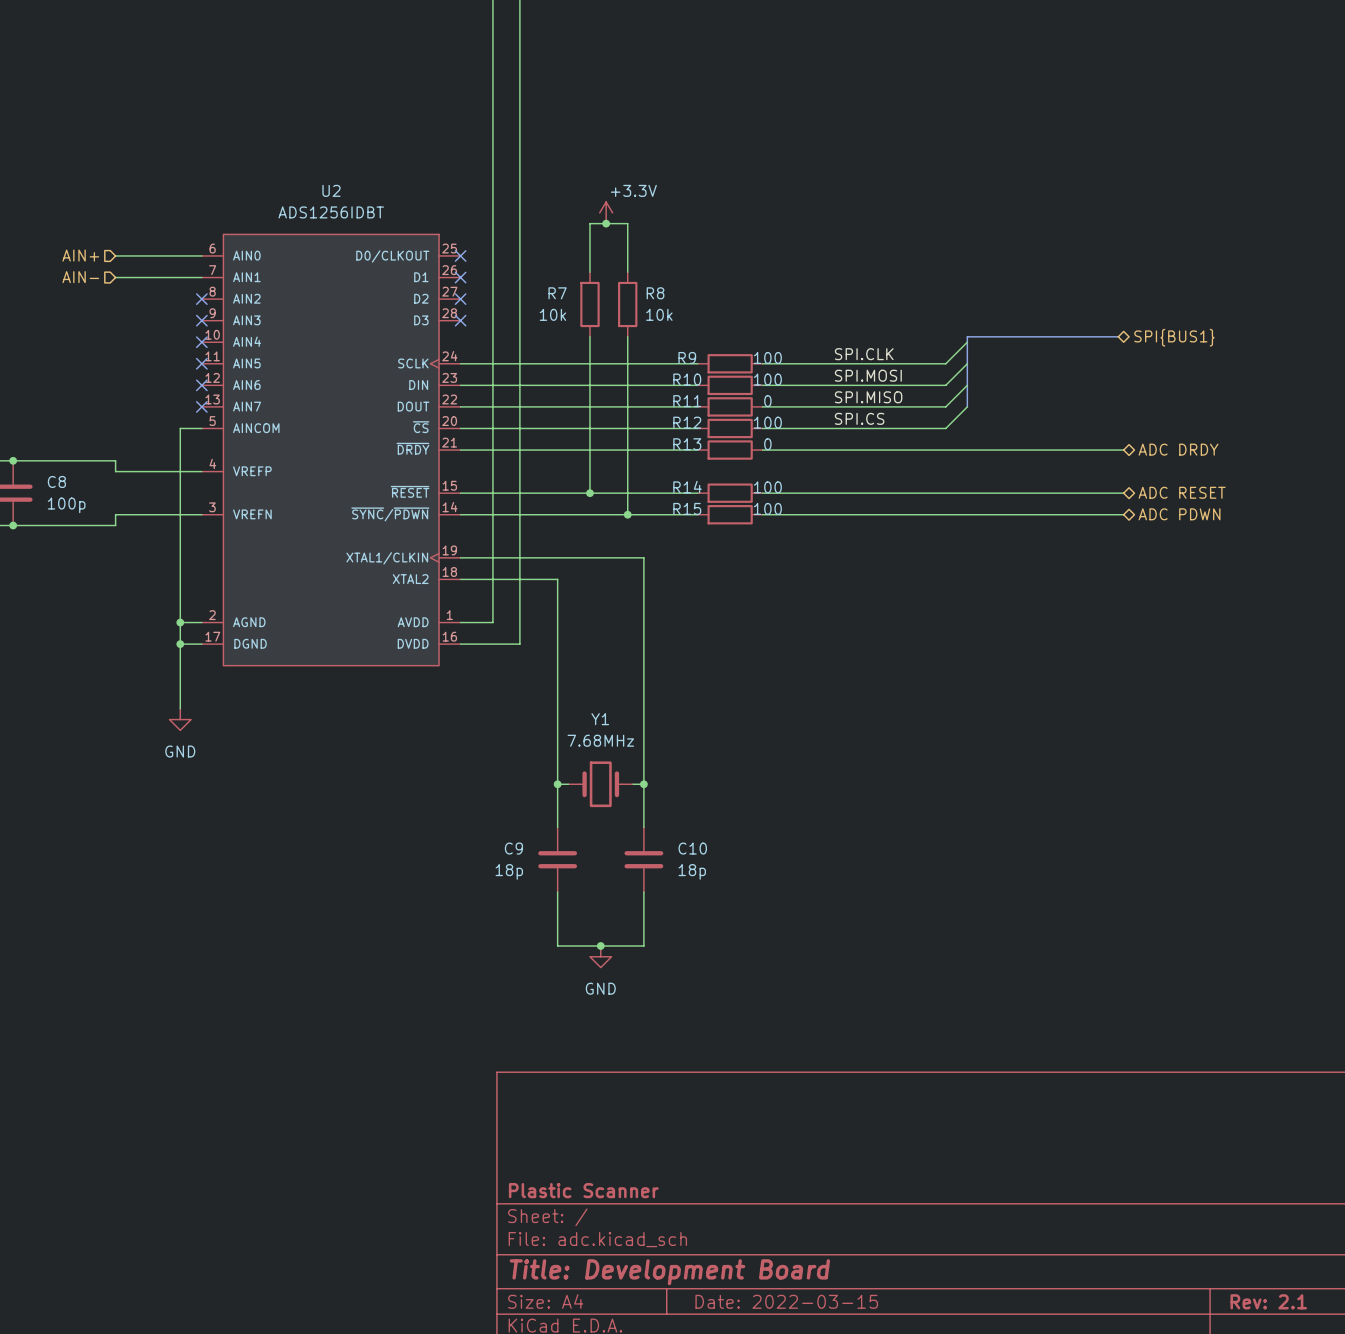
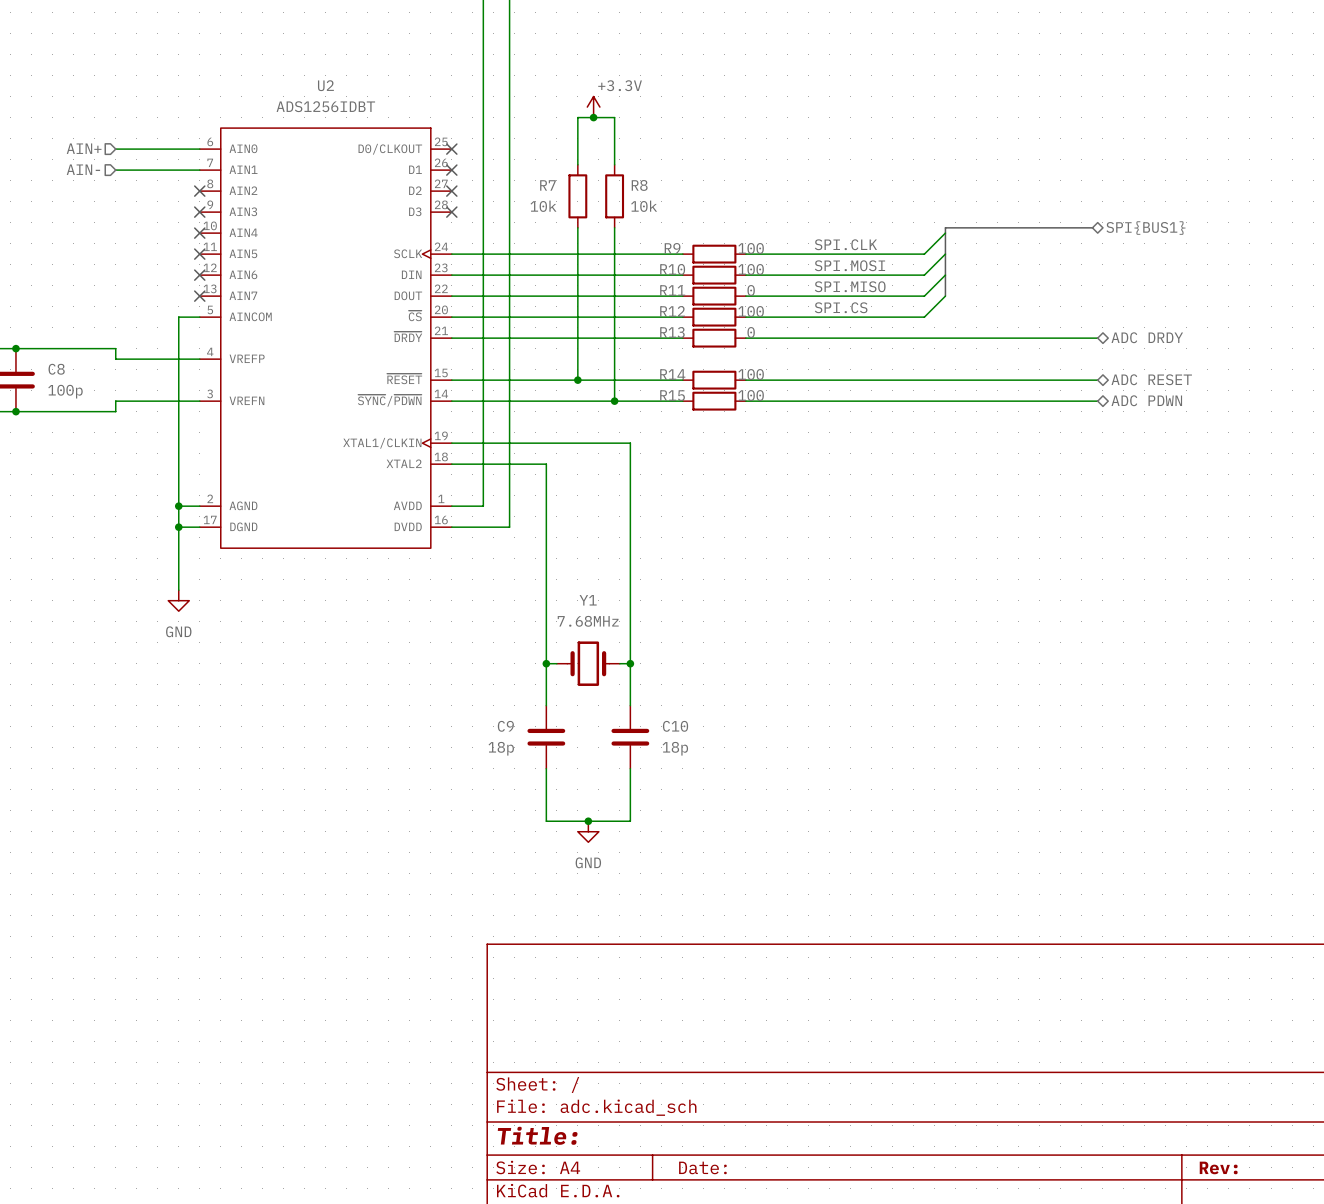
title block: Plastic Scanner (583, 1190) -> none
title block: Title: Development Board (669, 1272) -> Title: (537, 1135)
title block: Date: 2022-03-15 (786, 1301) -> Date: (702, 1167)
title block: Rev: 2.1 (1268, 1301) -> Rev: (1218, 1167)

